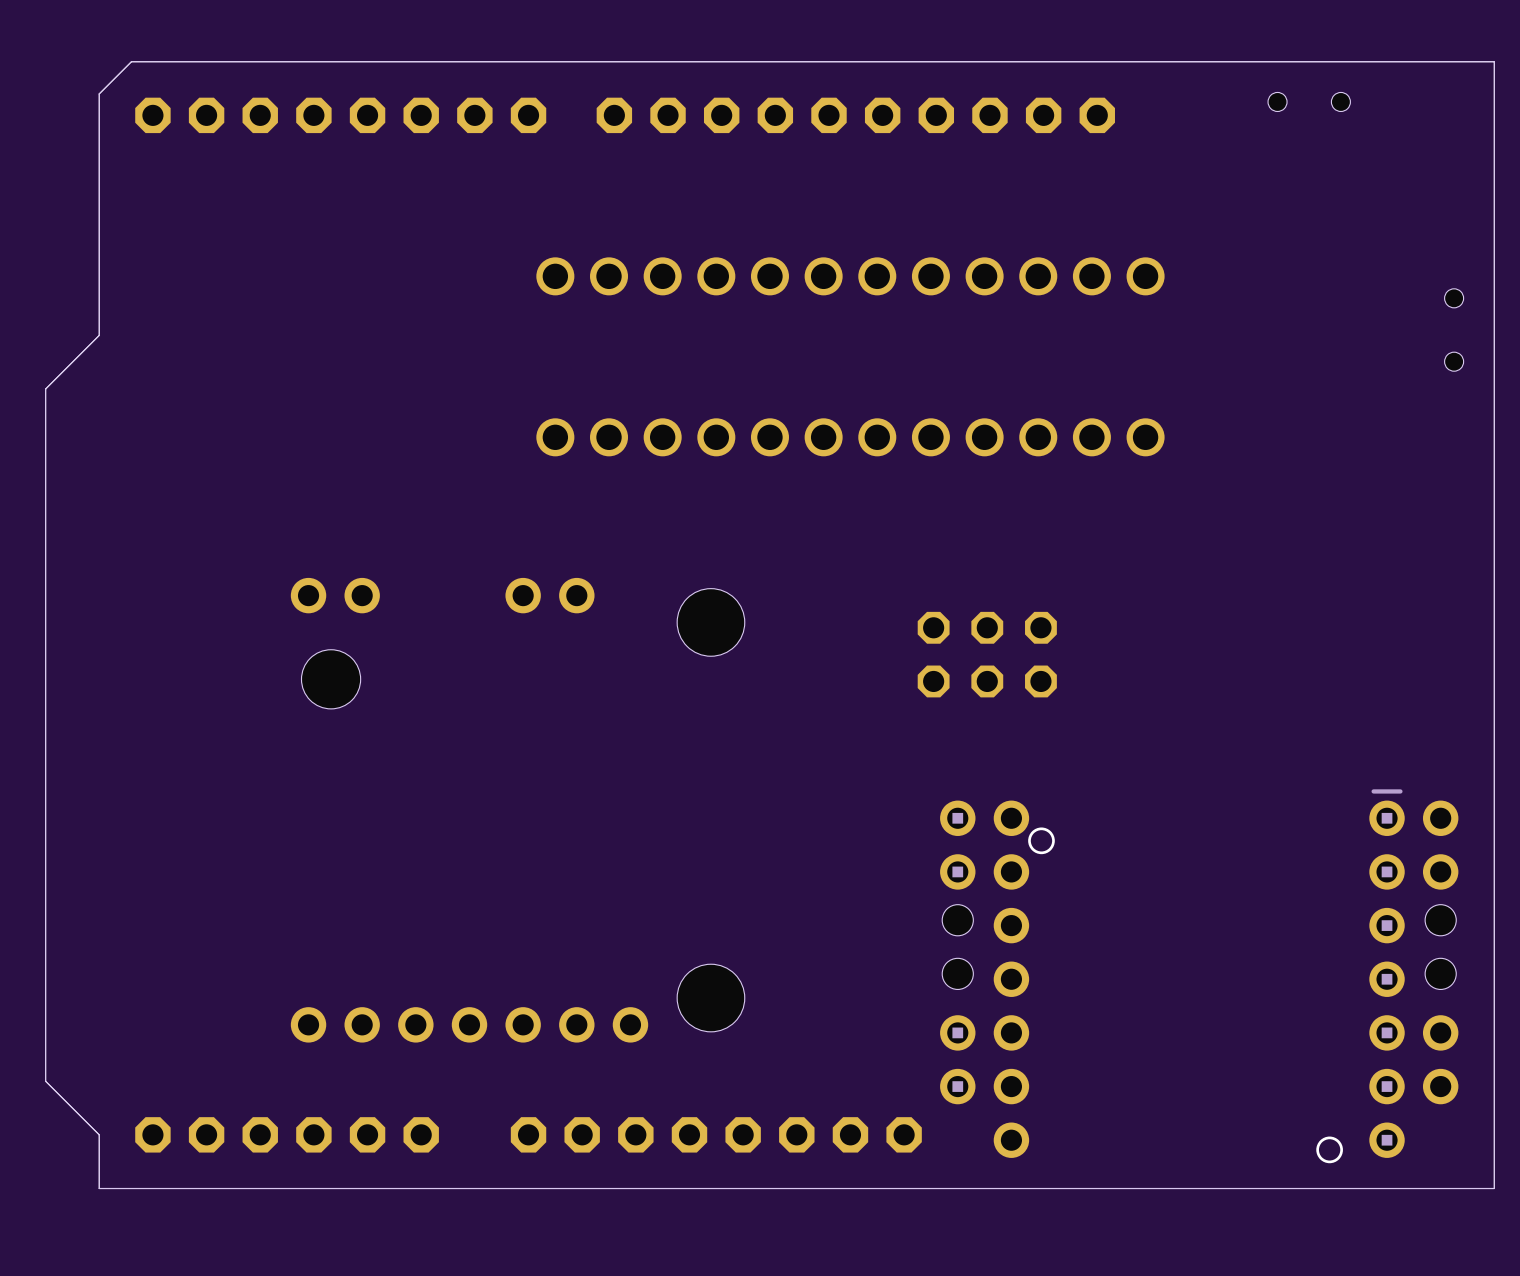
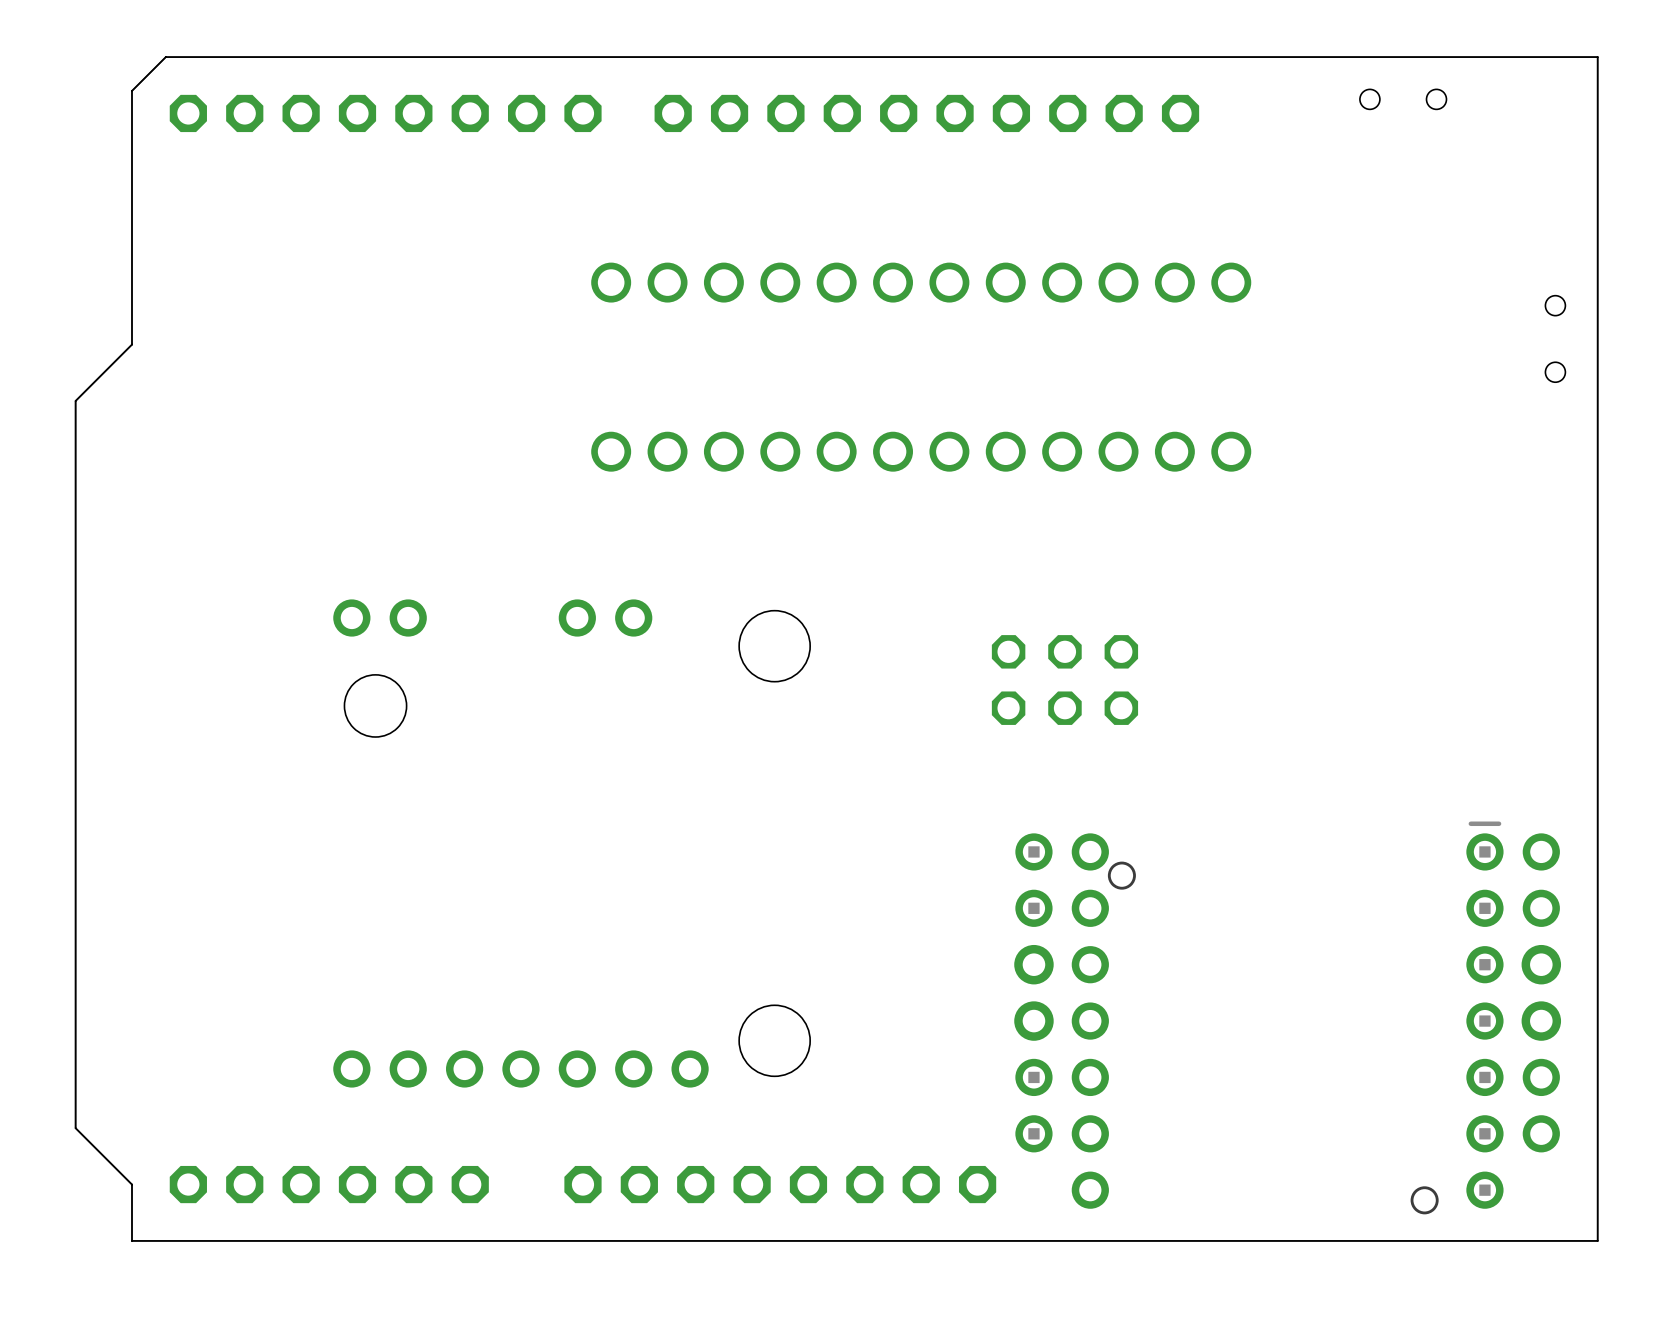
part: none -> (1033, 964)
part: none -> (1541, 964)
part: (957, 947) -> none
part: (1440, 947) -> none
part: none -> (1033, 1021)
part: none -> (1541, 1021)

